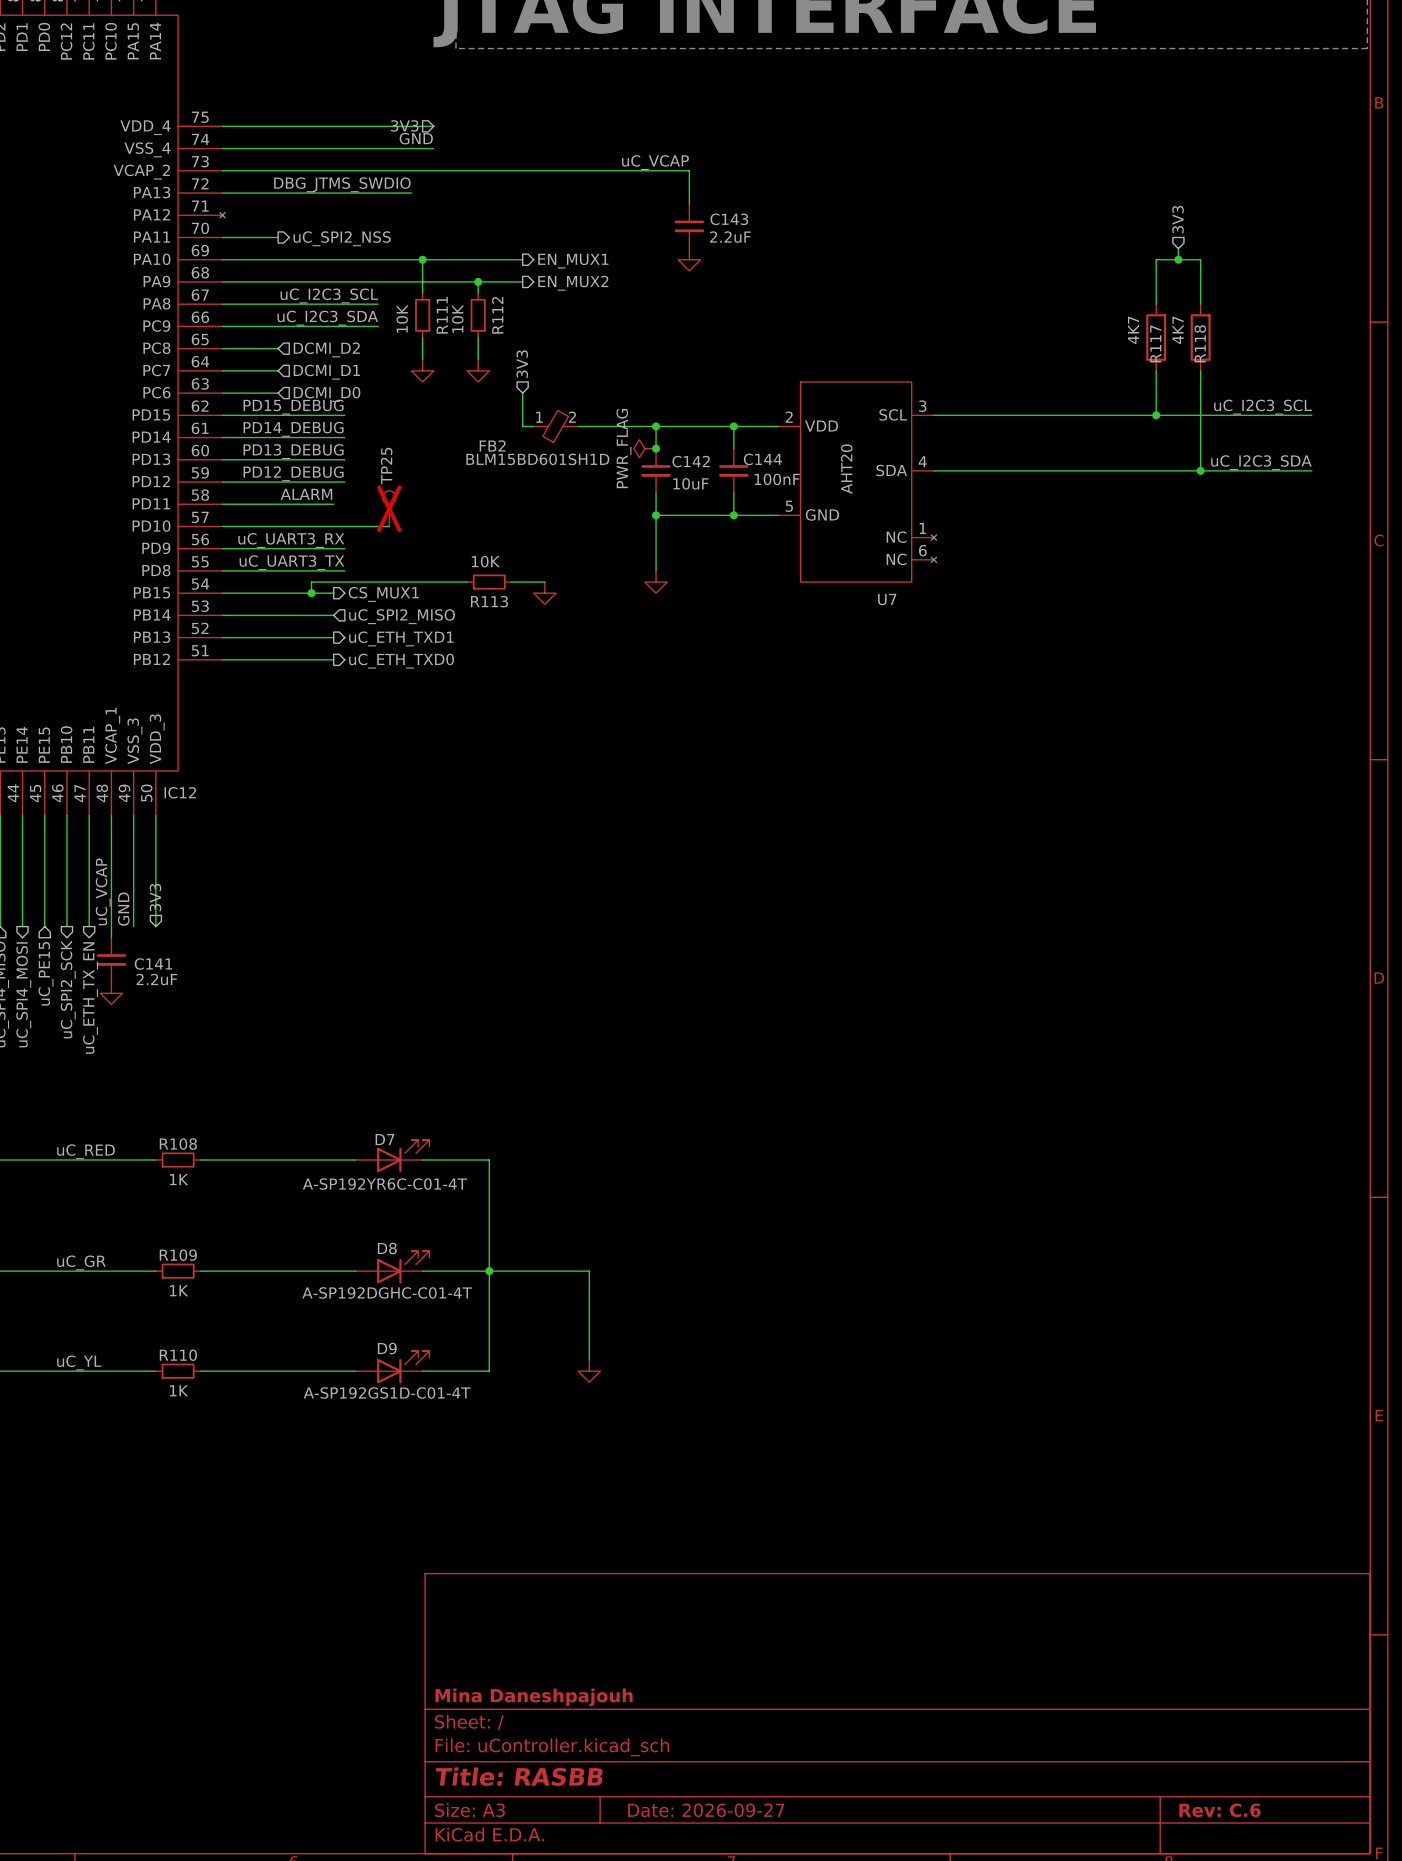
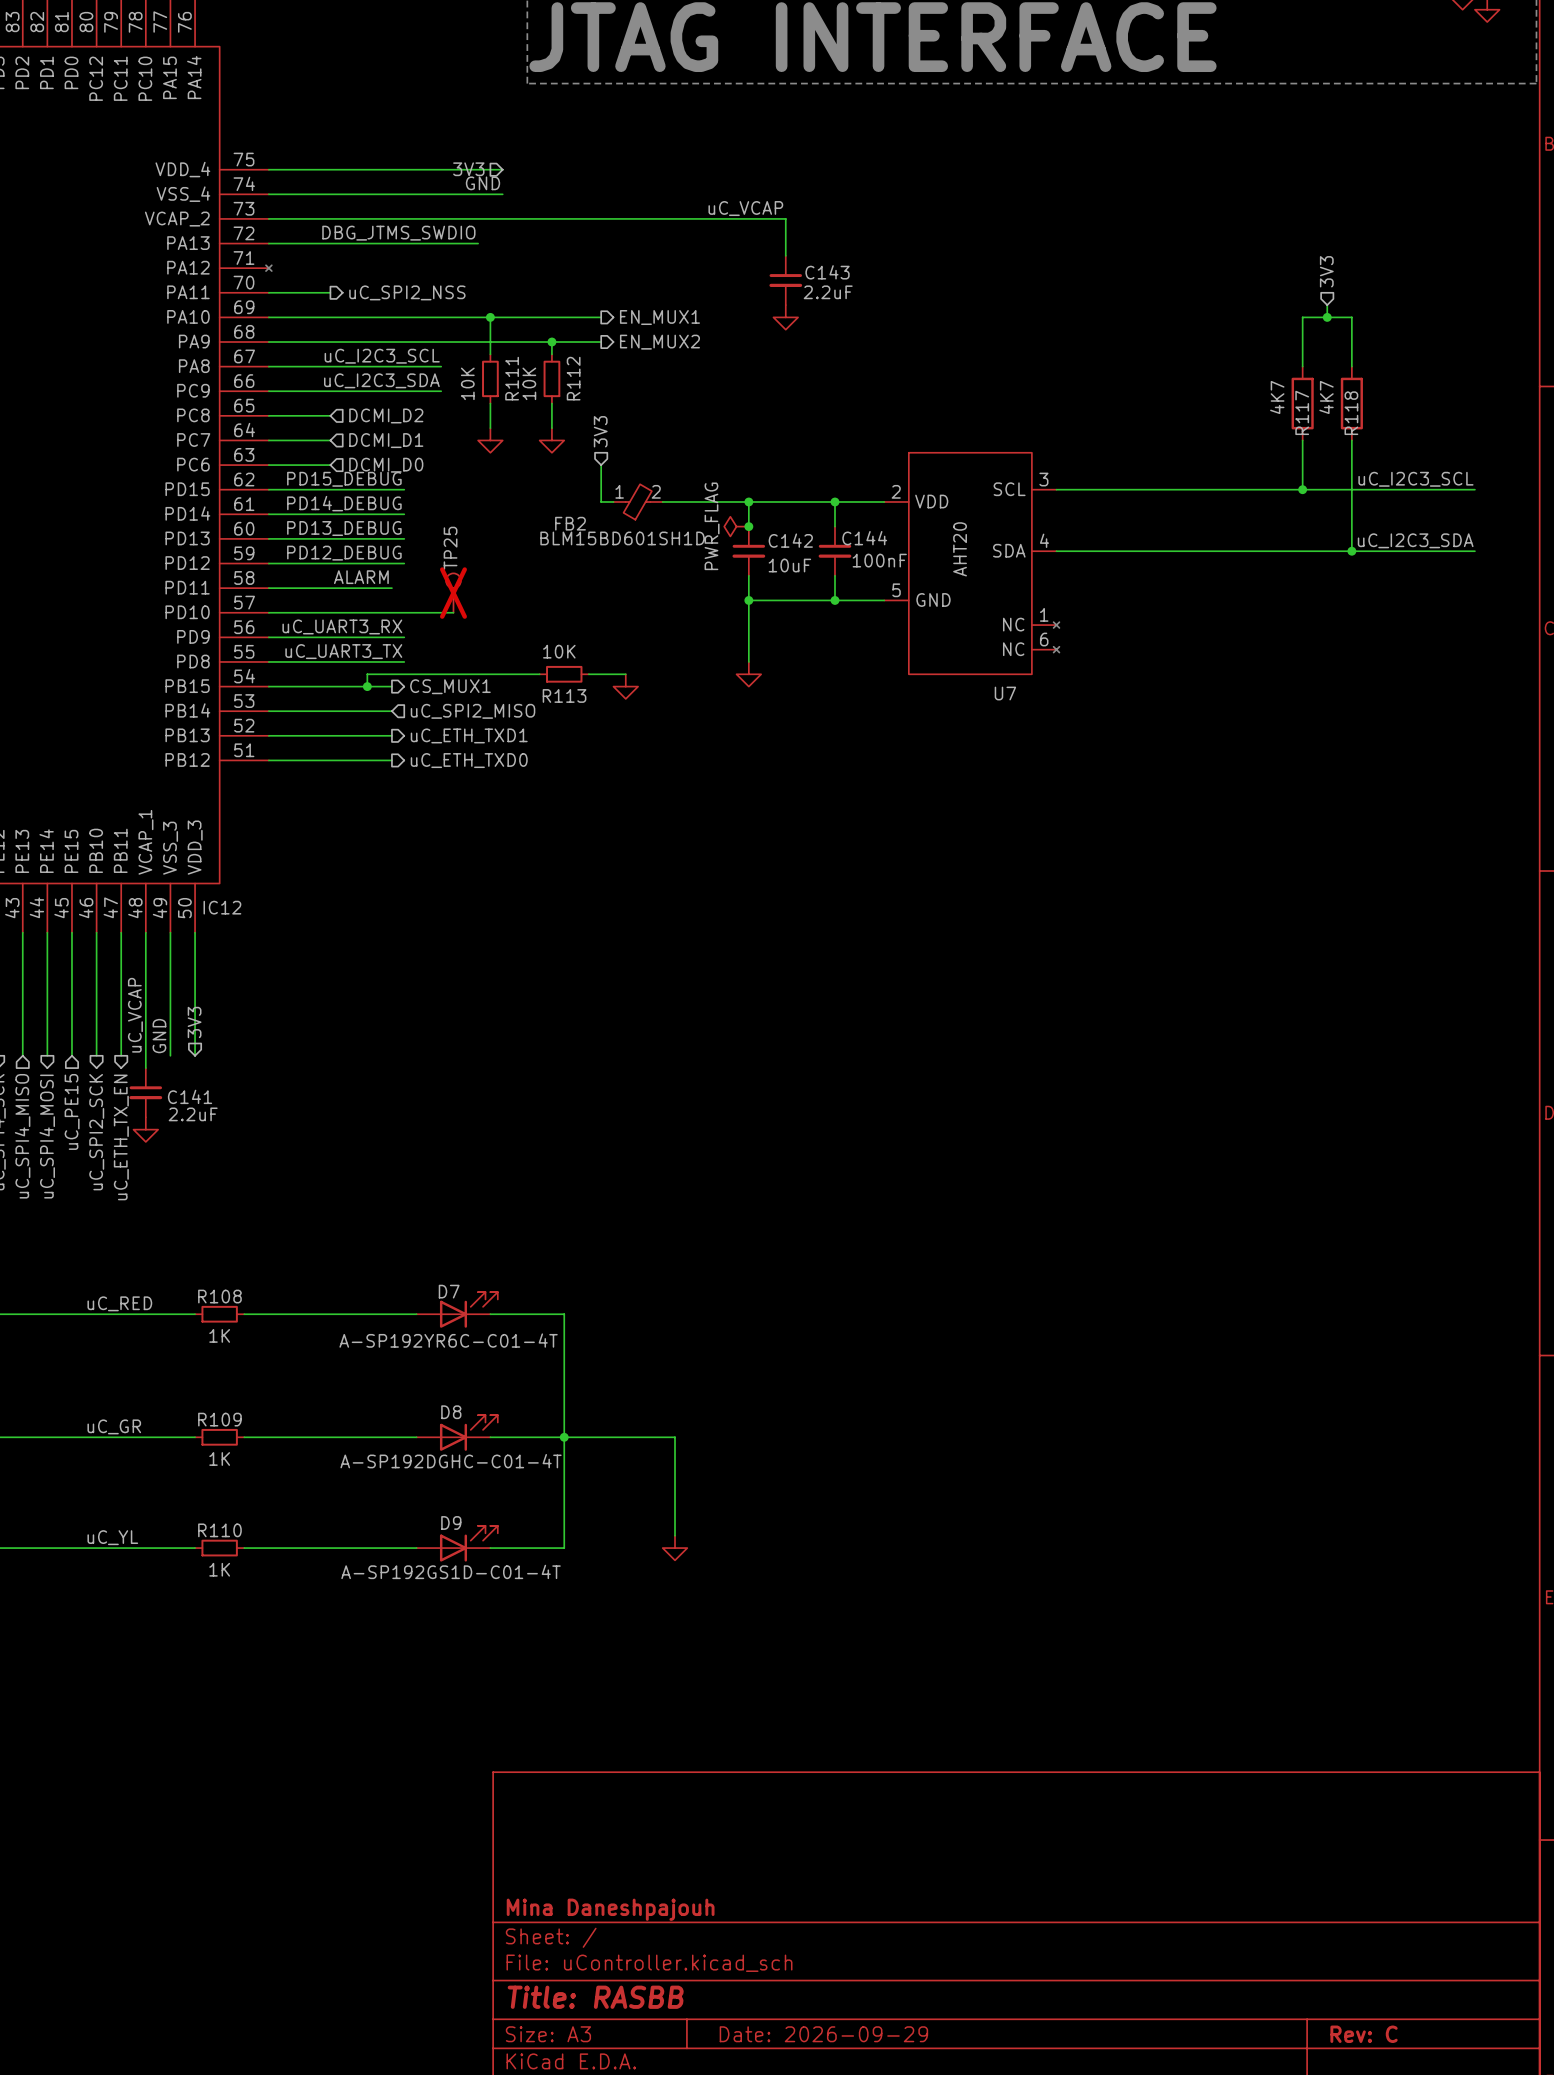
title block: Date: 2026-09-27 (706, 1810) -> Date: 2026-09-29 (823, 2034)
title block: Rev: C.6 (1220, 1810) -> Rev: C (1364, 2034)

